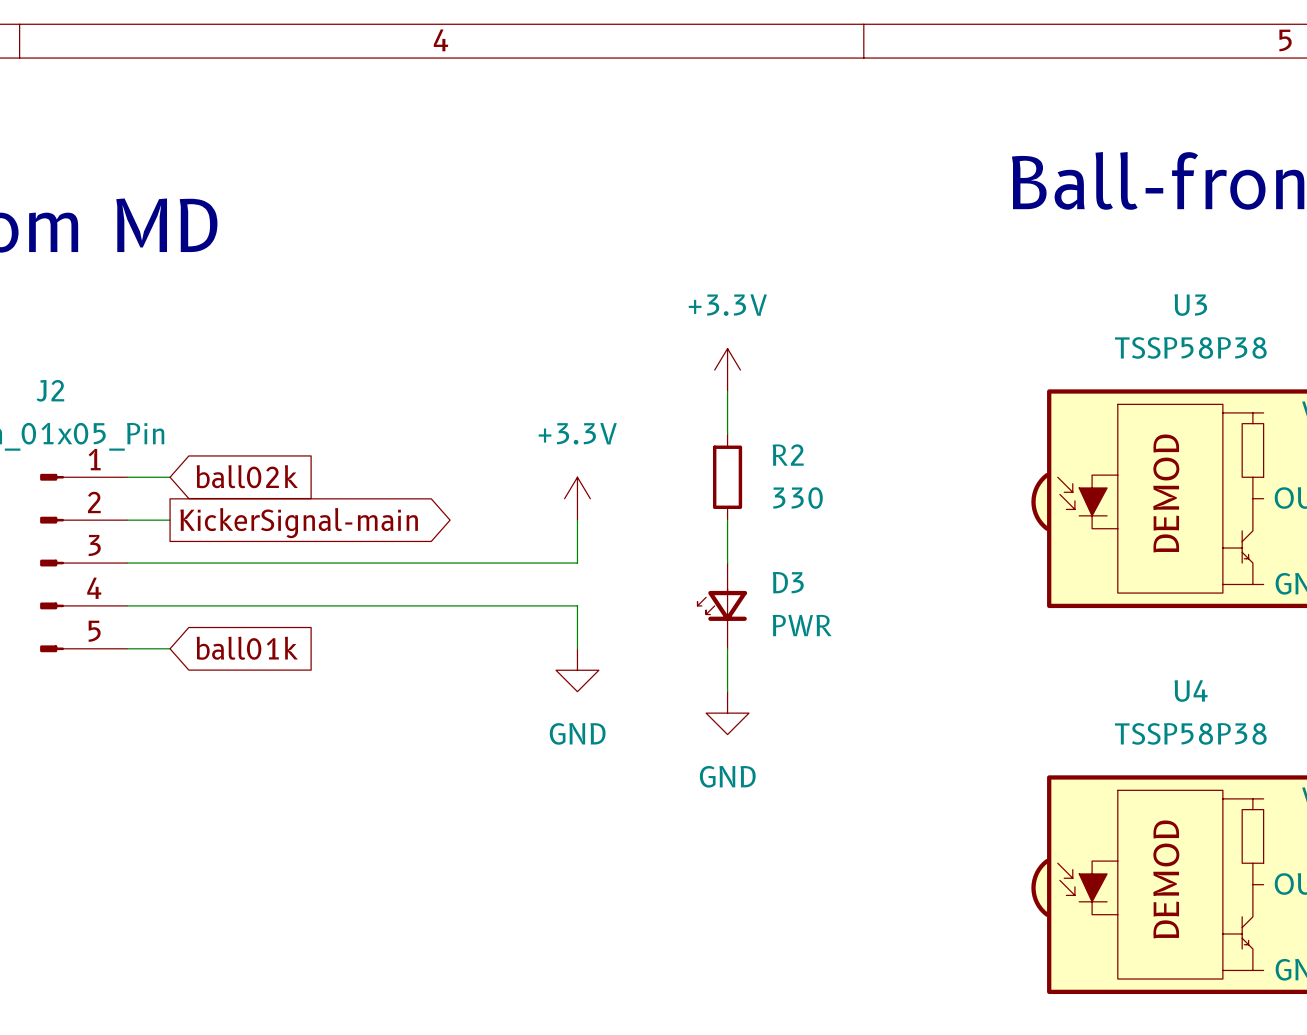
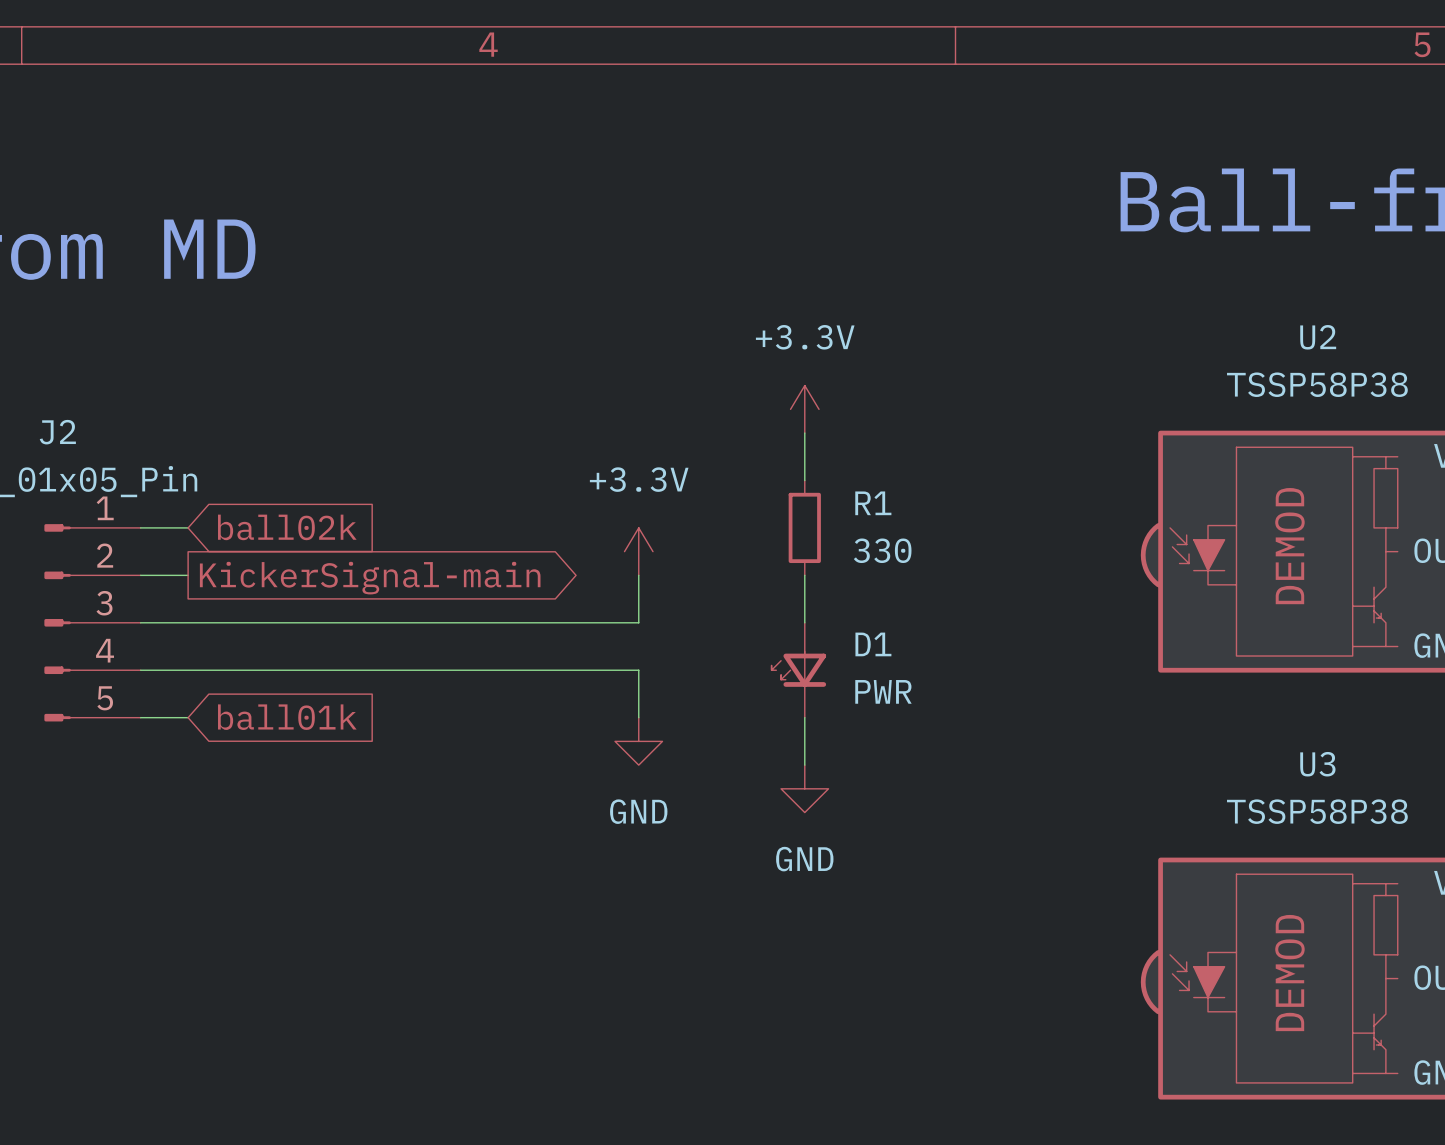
U3 name: U3 (1190, 305) -> U2 (1318, 337)
R2 name: R2 (788, 455) -> R1 (873, 503)
D3 name: D3 (788, 582) -> D1 (873, 644)
U4 name: U4 (1191, 691) -> U3 (1317, 764)

